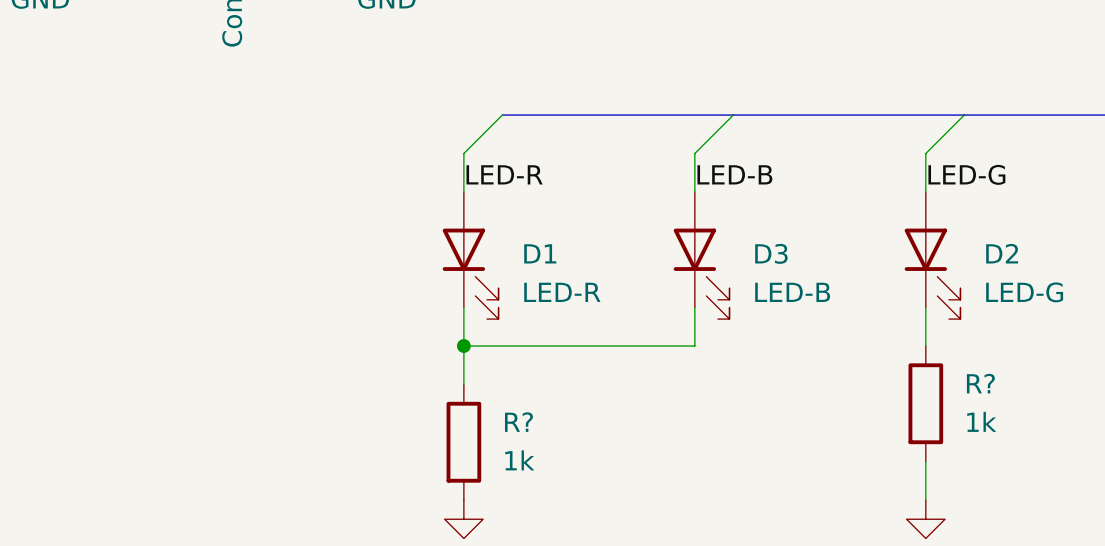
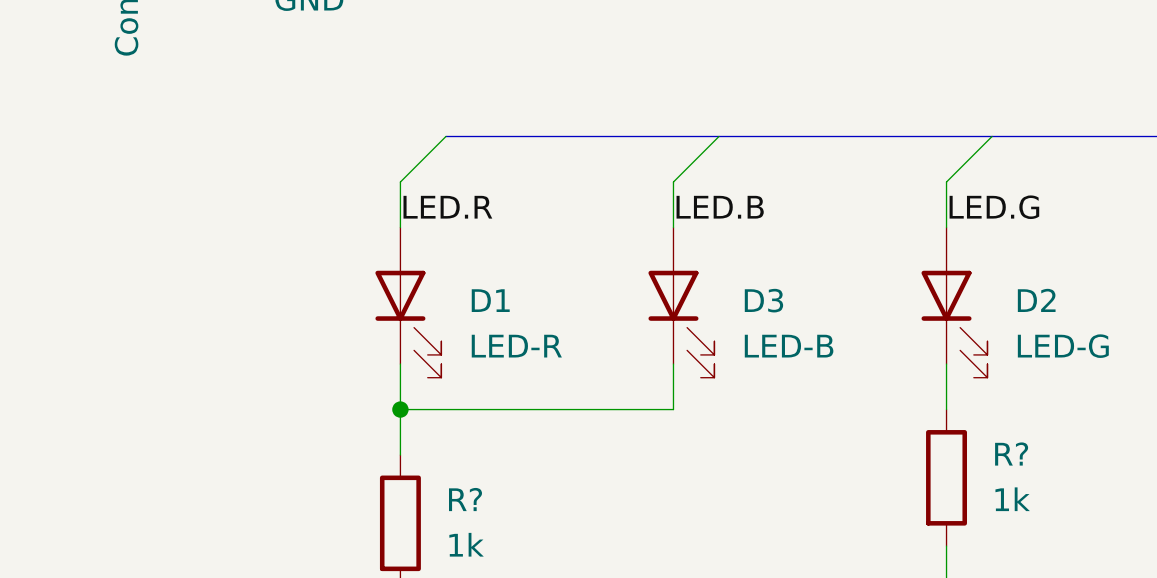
label: LED-R (504, 174) -> LED.R (447, 207)
label: LED-B (734, 174) -> LED.B (720, 207)
label: LED-G (966, 174) -> LED.G (994, 207)

